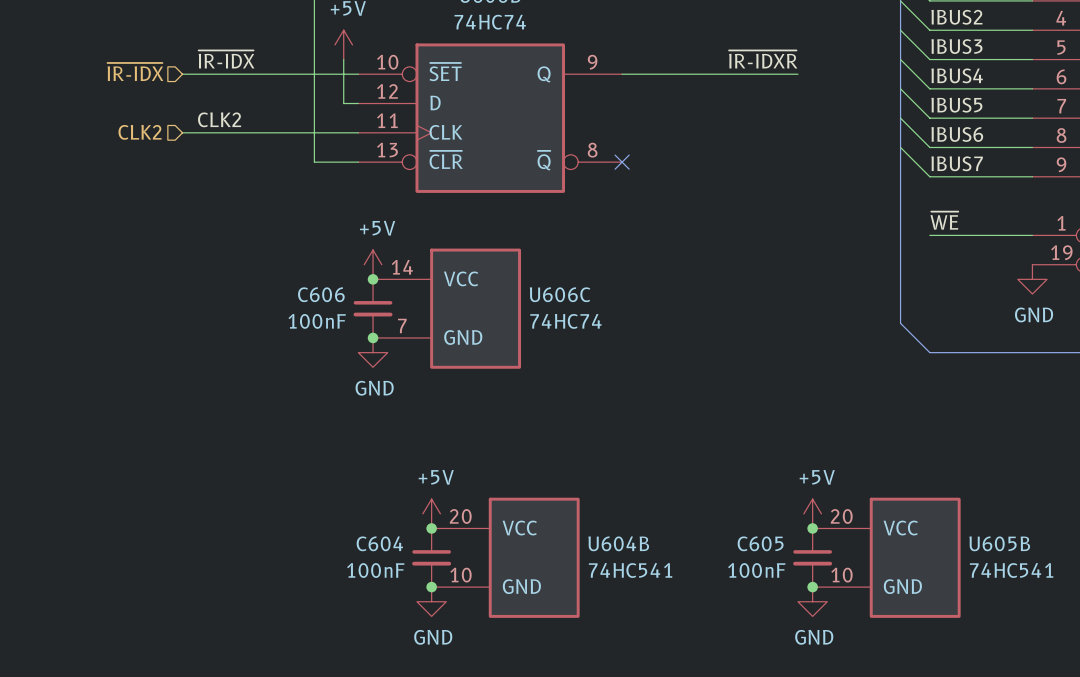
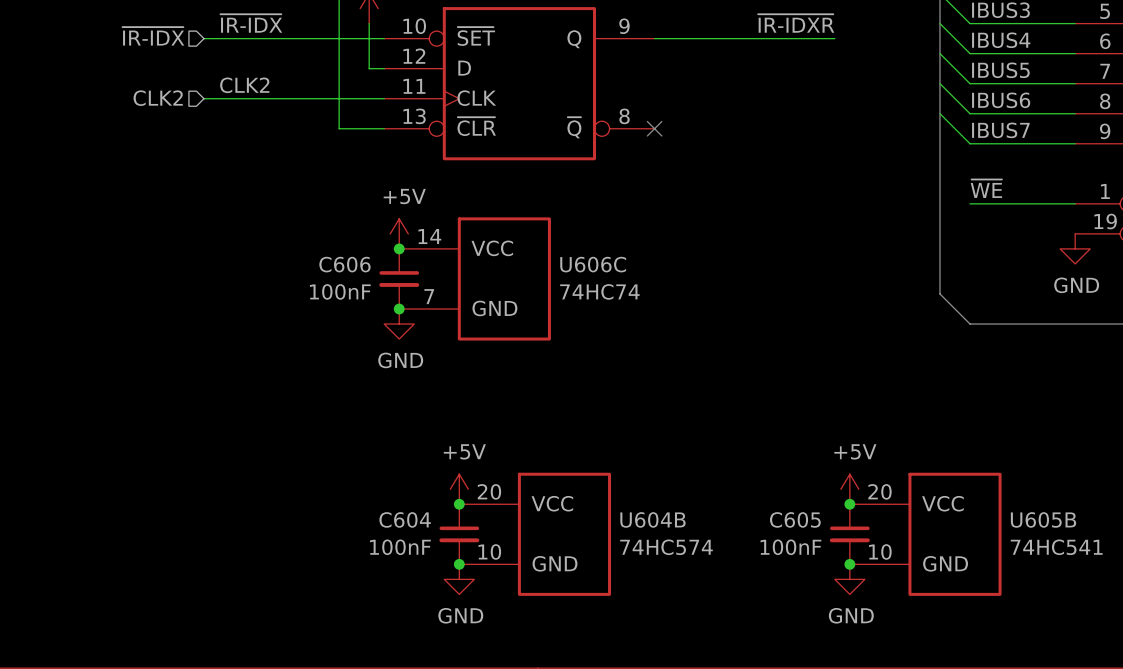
U604B value: 74HC541 (630, 570) -> 74HC574 (666, 547)

